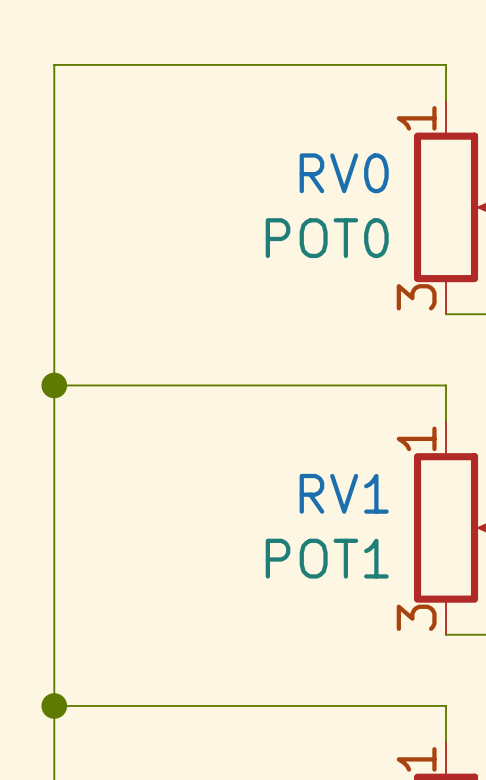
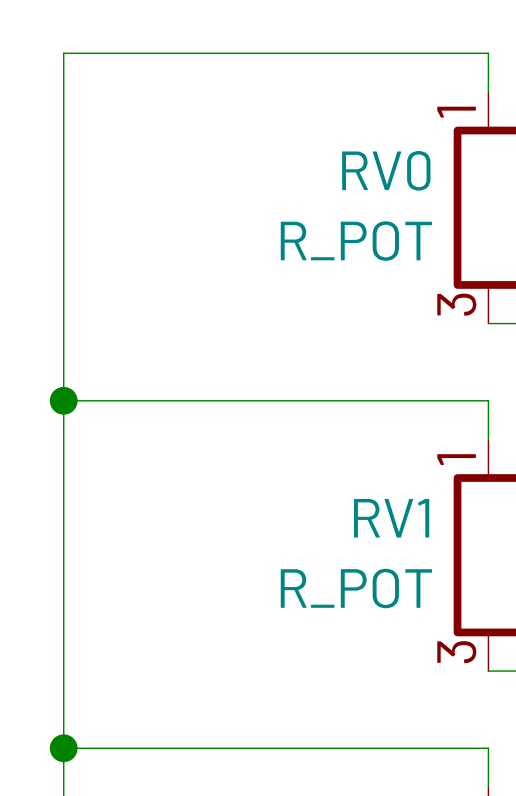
RV0 value: POT0 (327, 238) -> R_POT (356, 241)
RV1 value: POT1 (327, 558) -> R_POT (356, 588)

